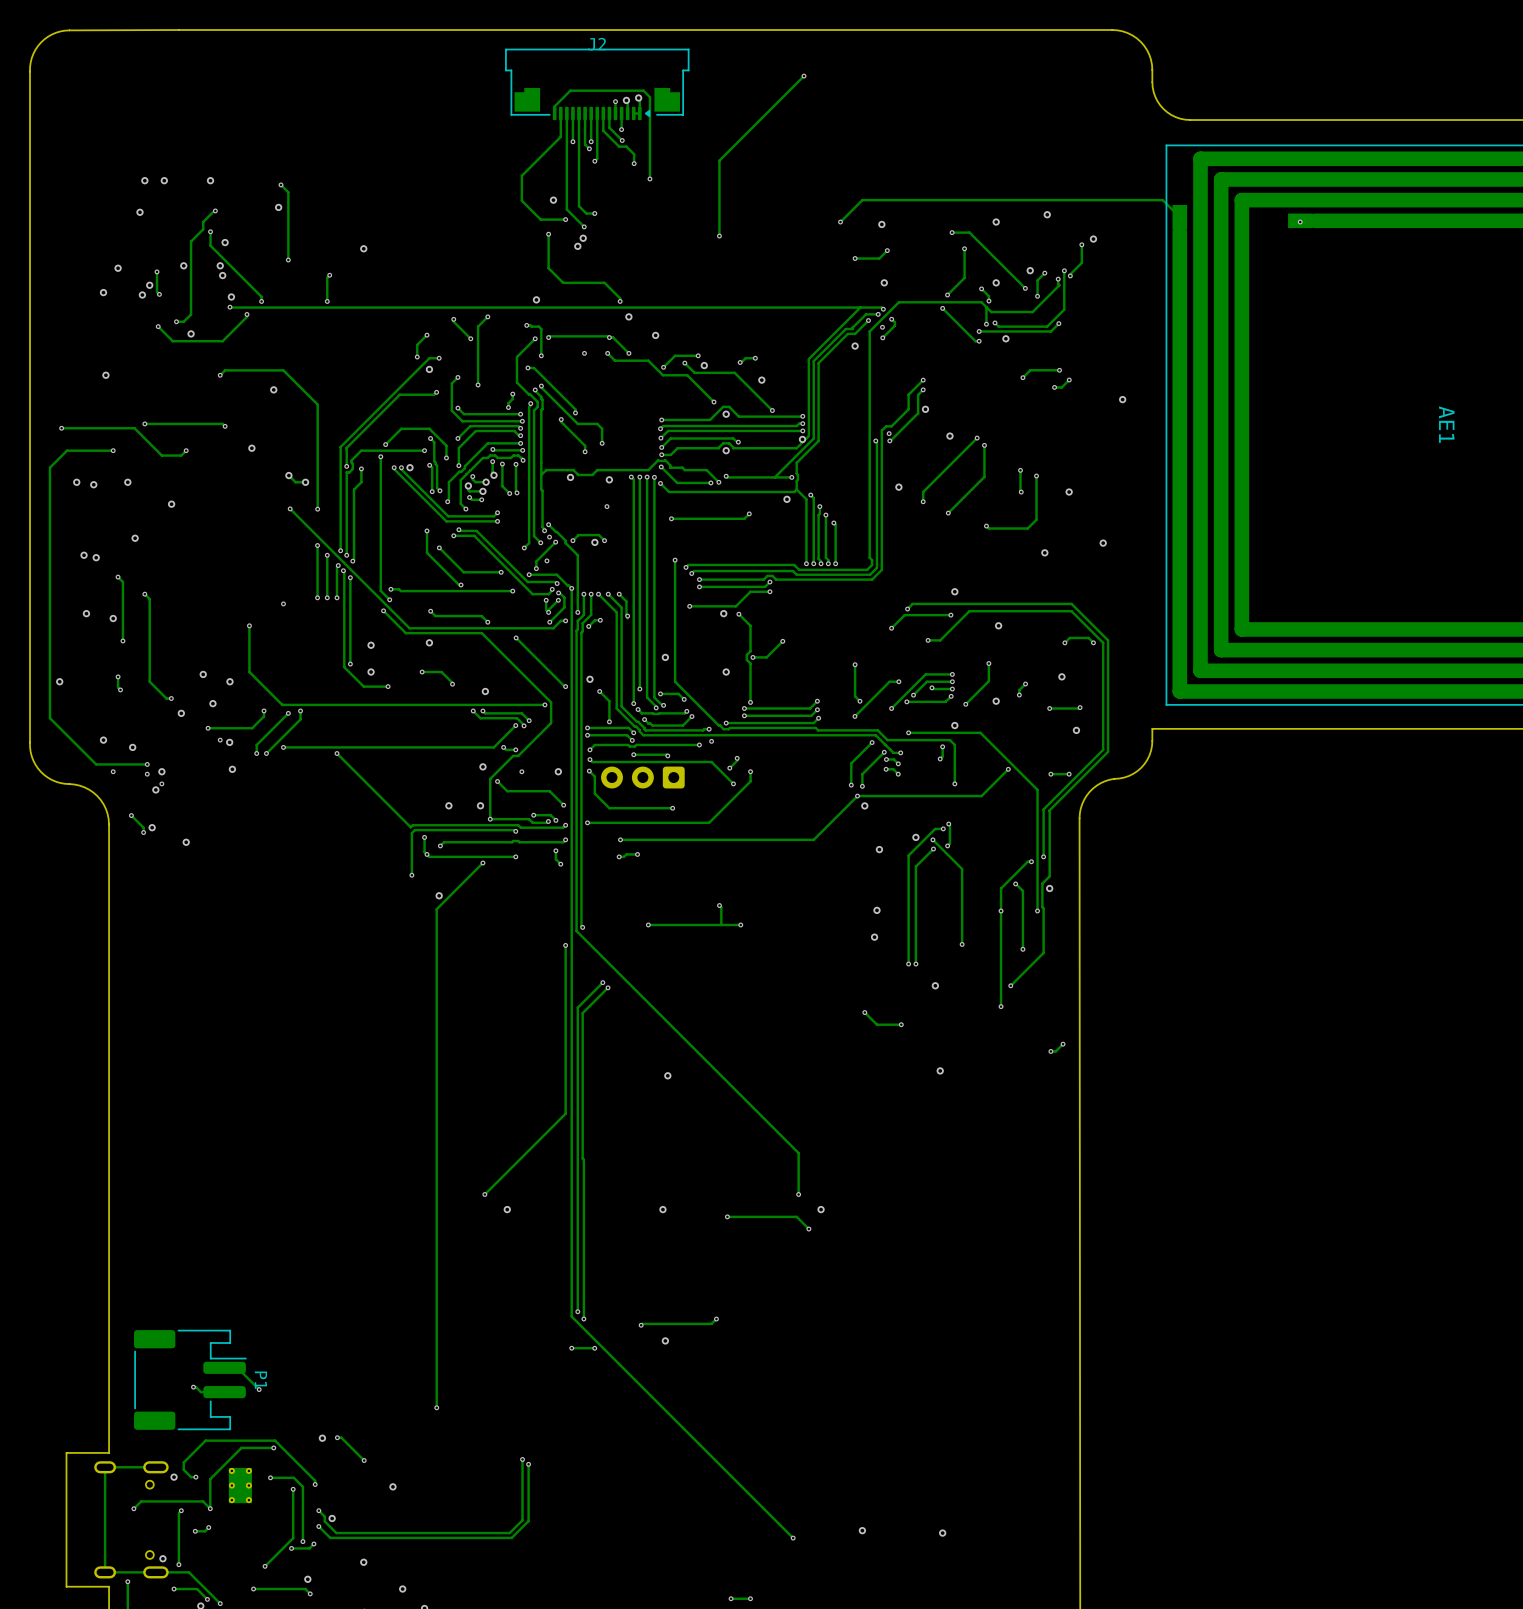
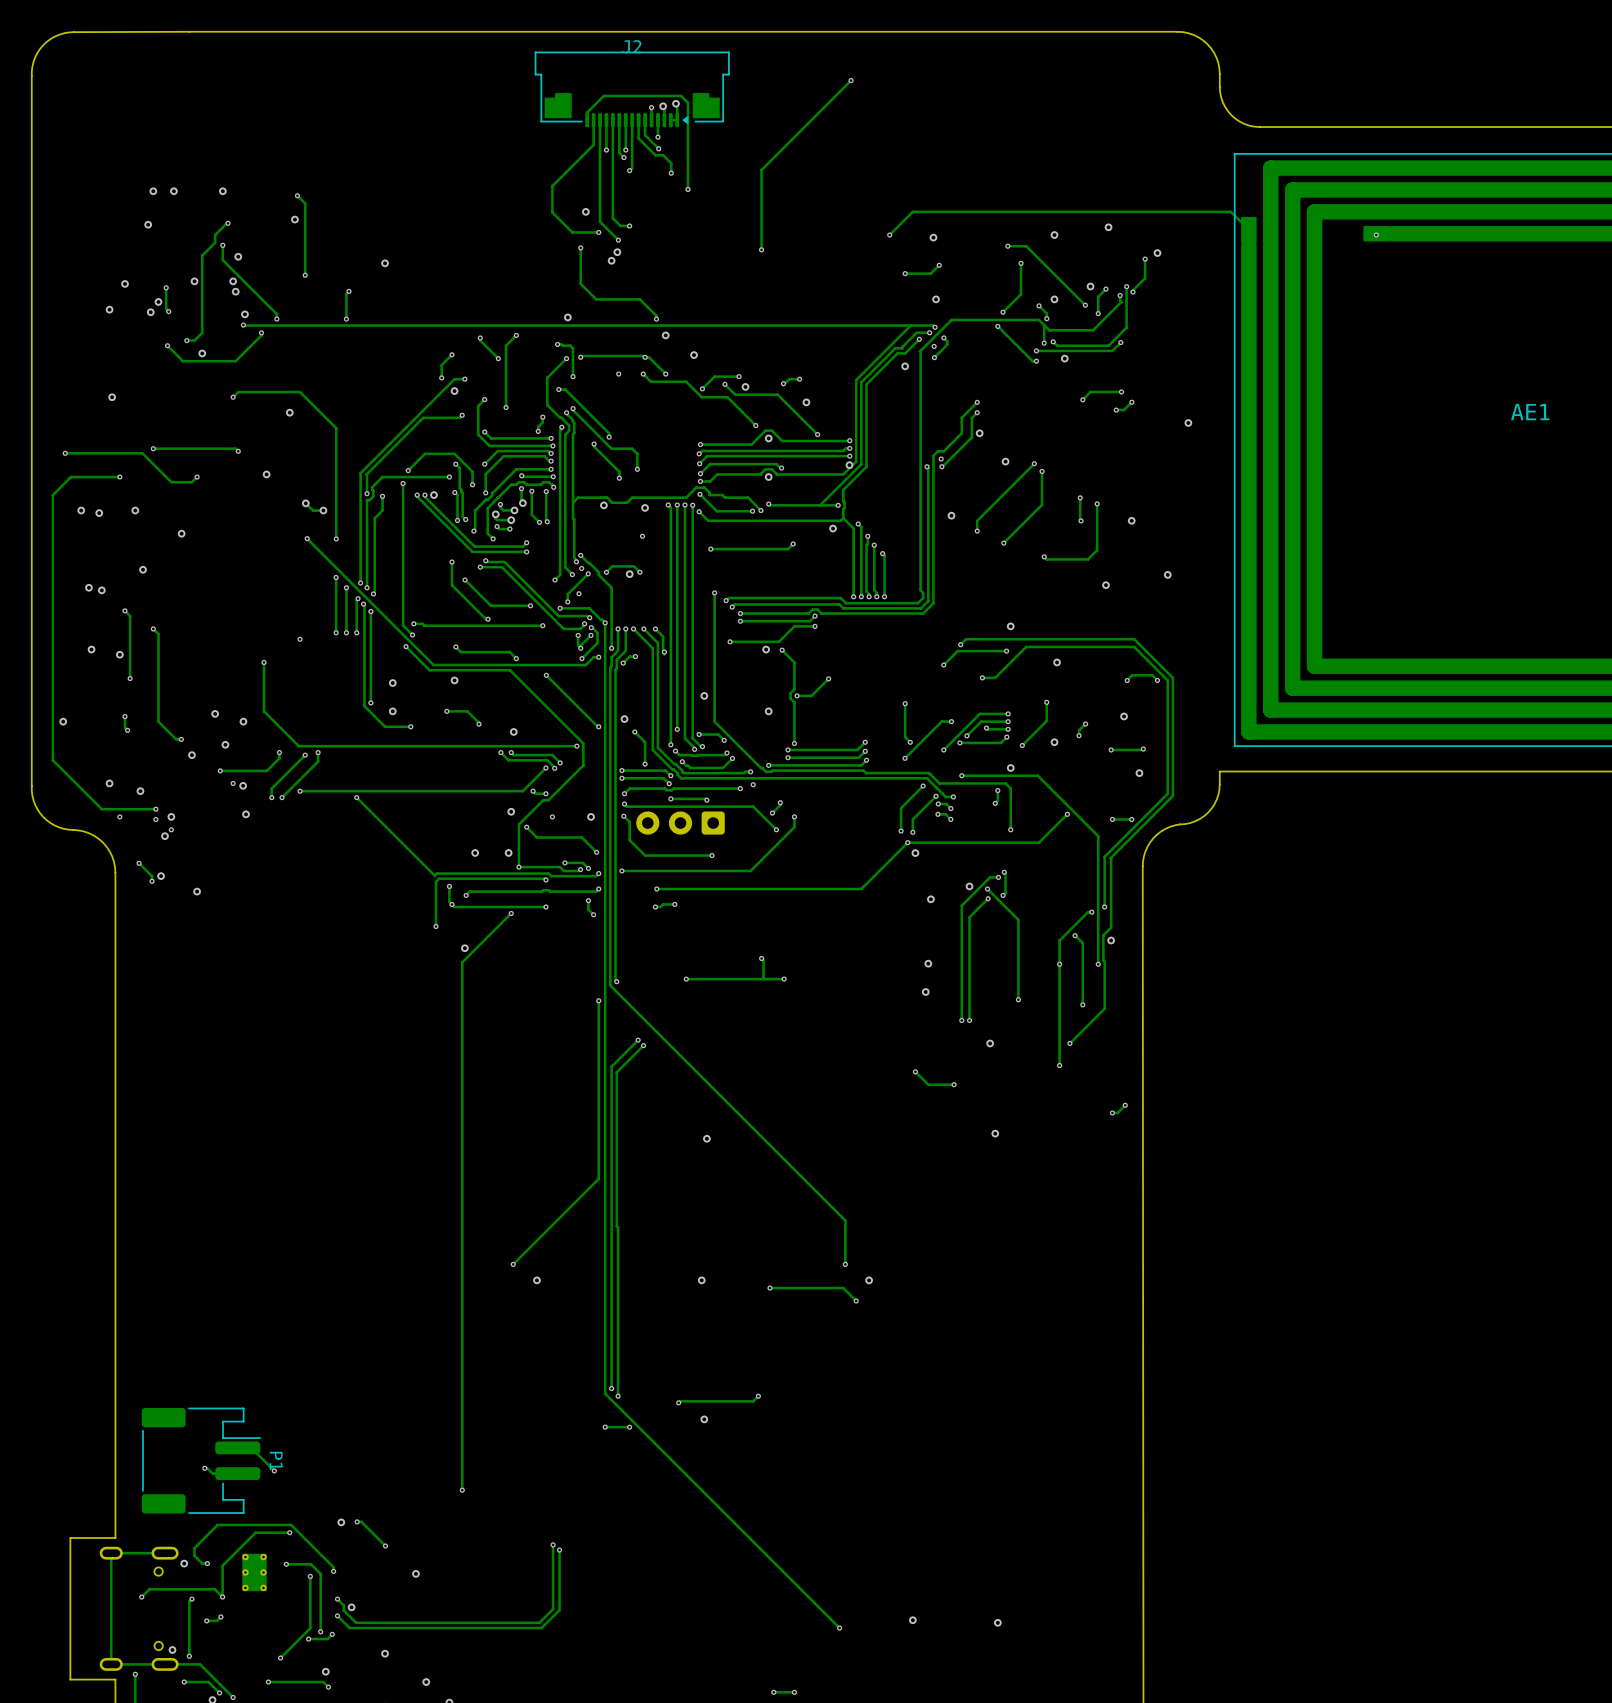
AE1 name rotation: 0° (1446, 424) -> 90° counterclockwise (1530, 412)

